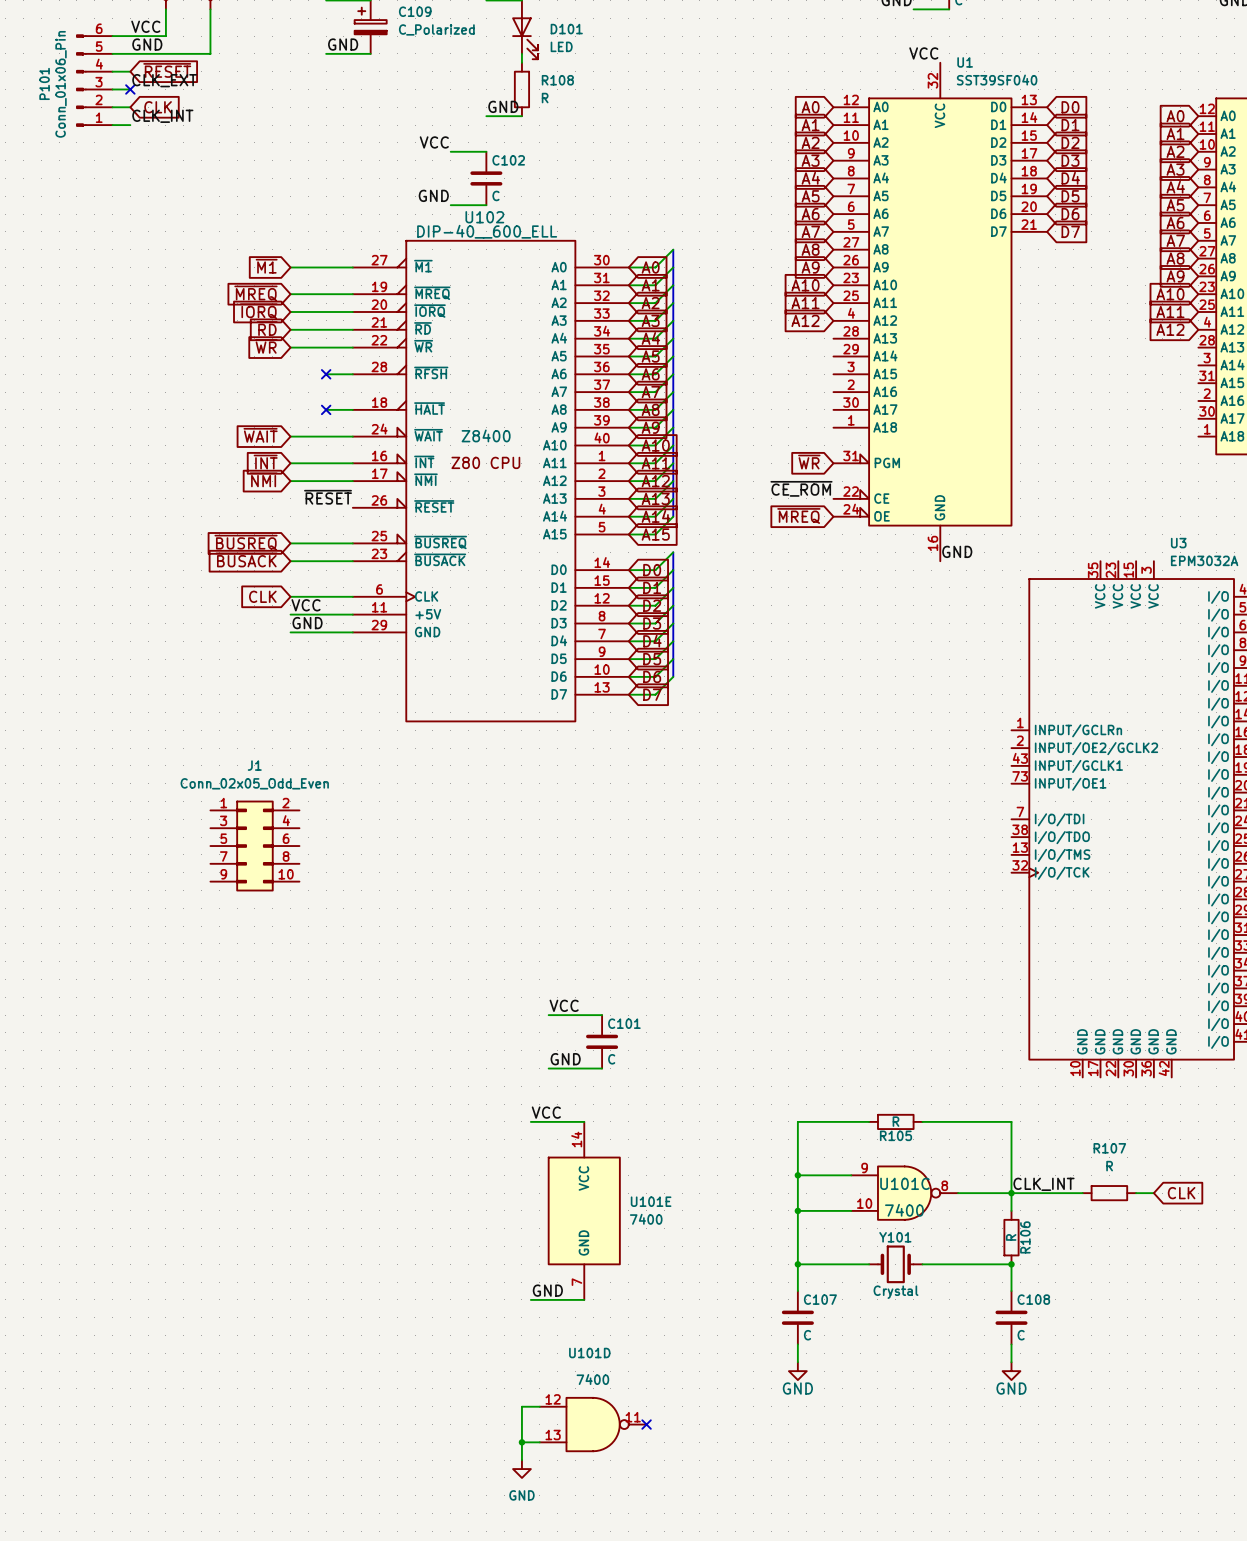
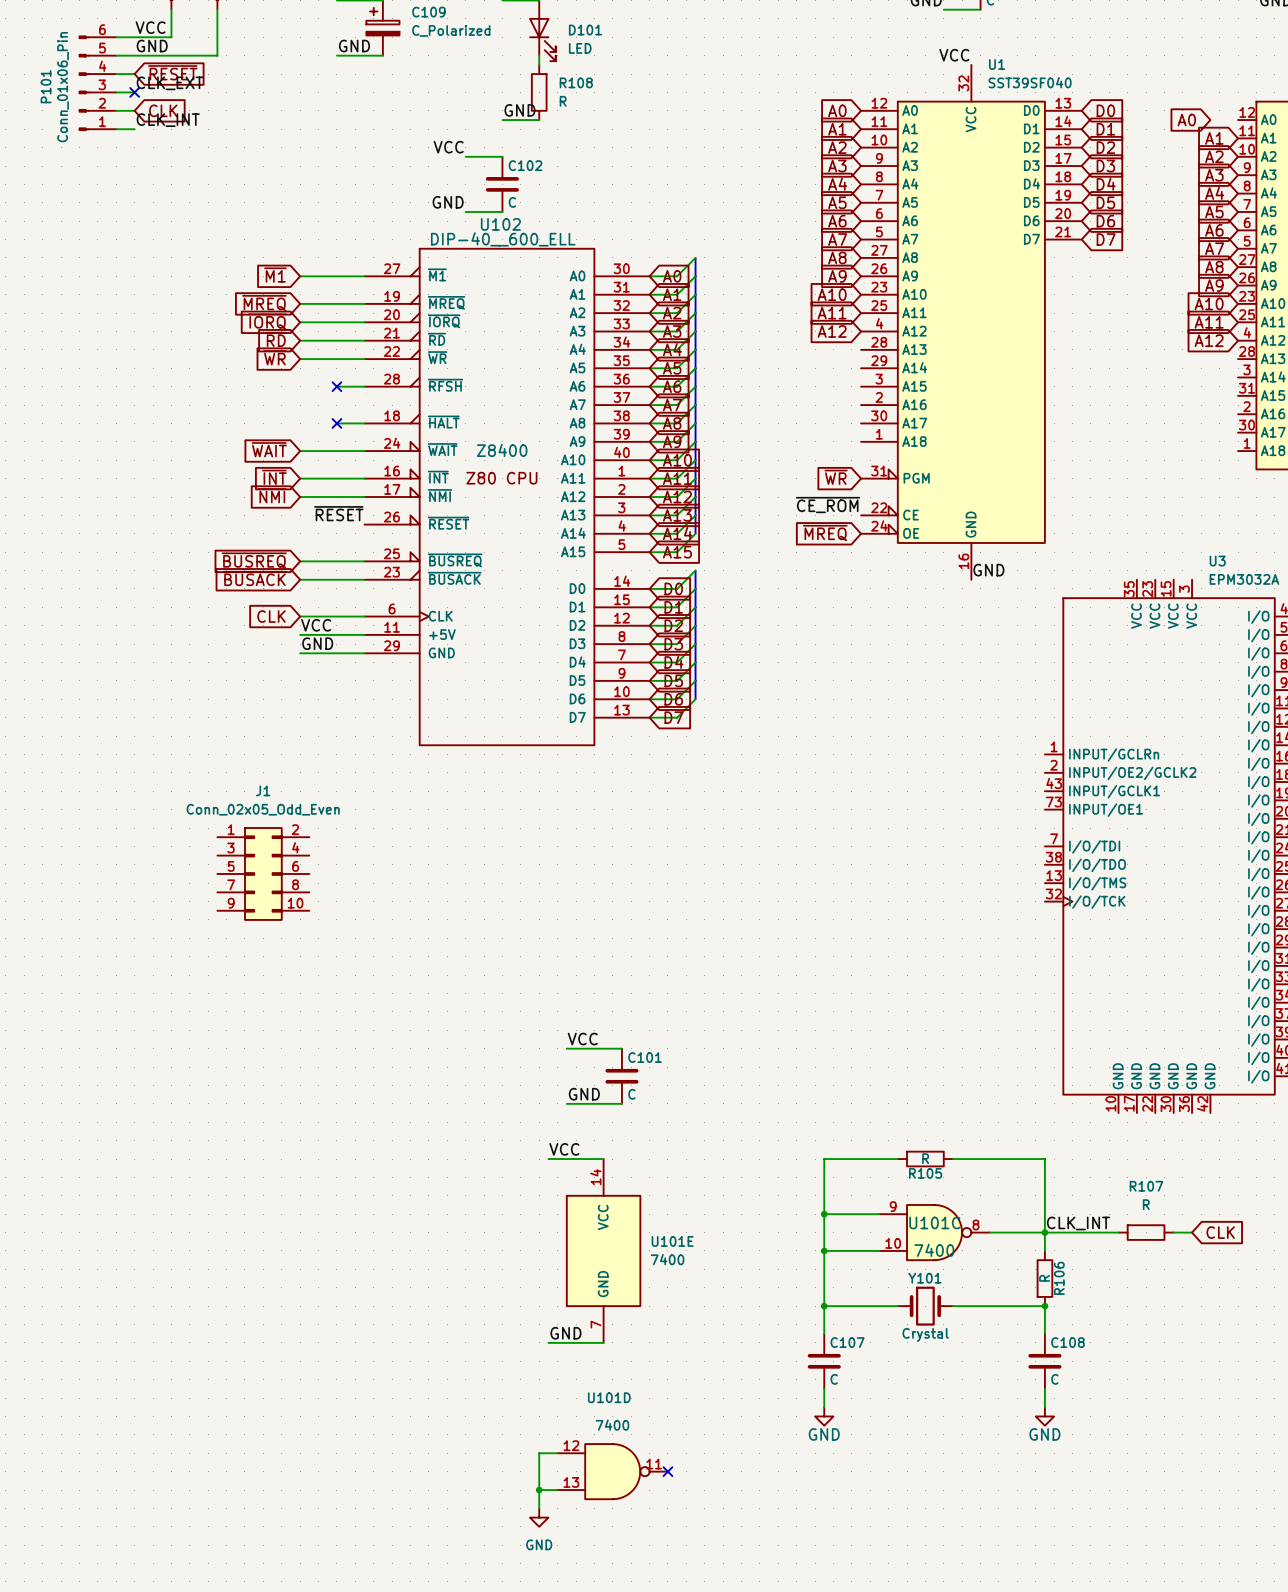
global label position: A0 (1175, 116) -> A0 (1186, 120)

